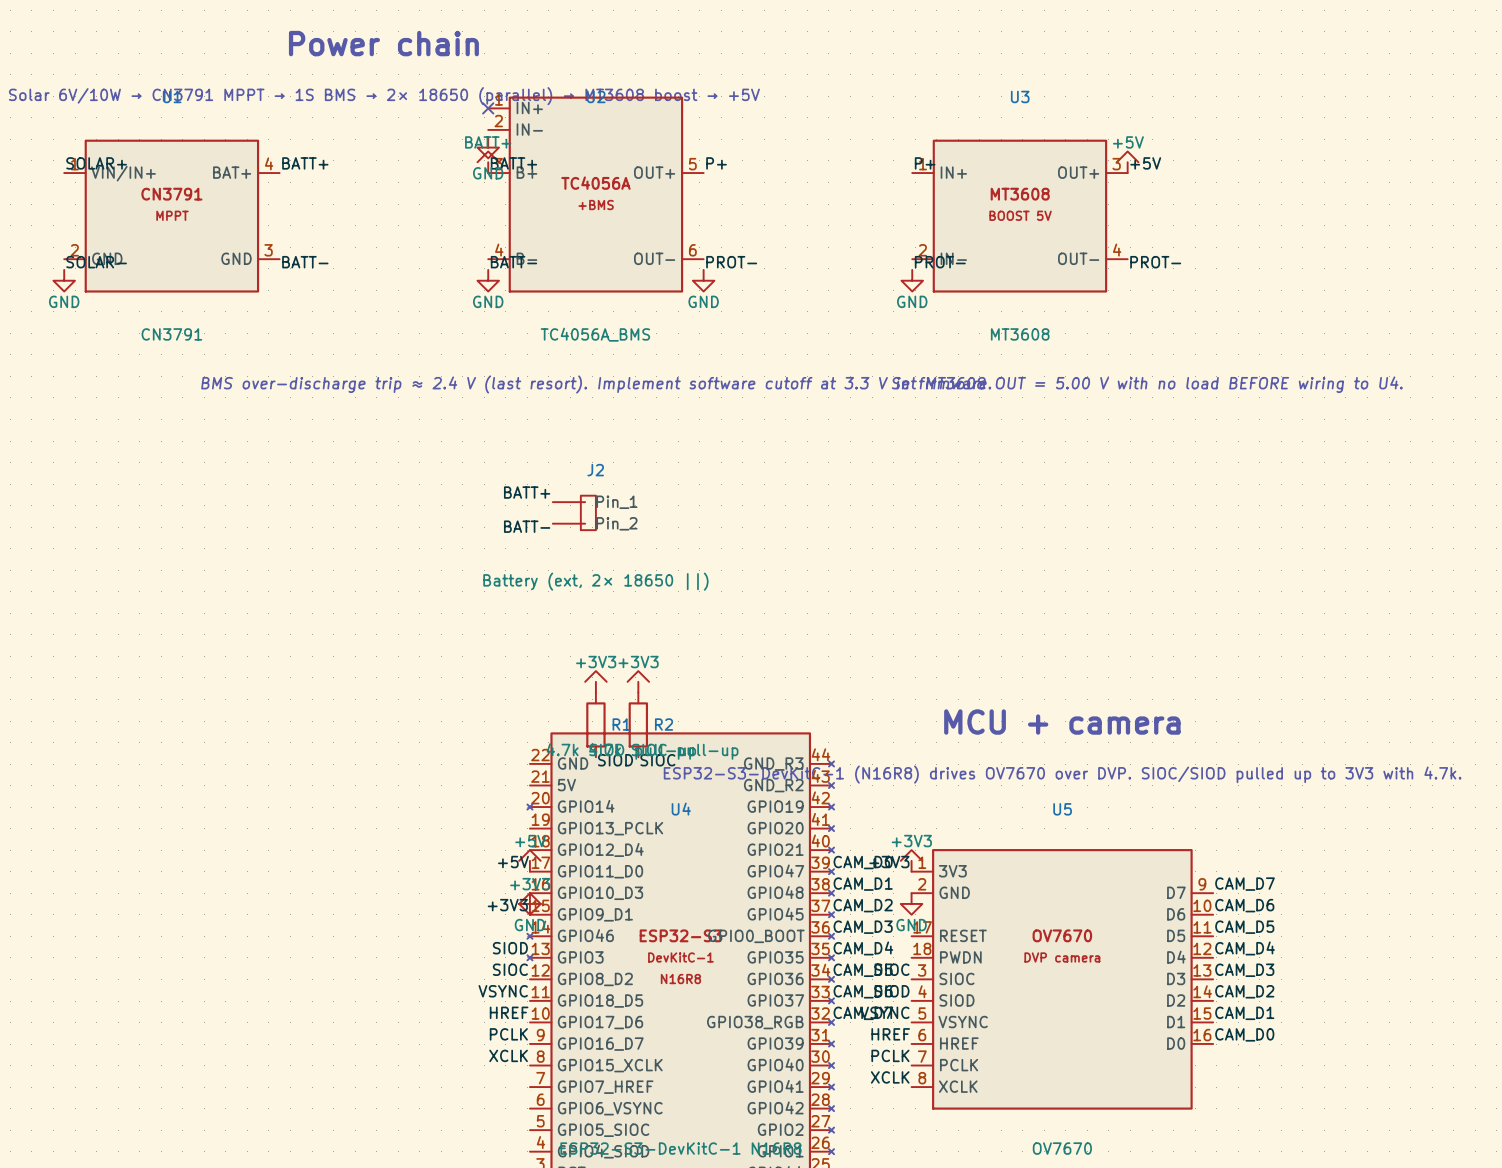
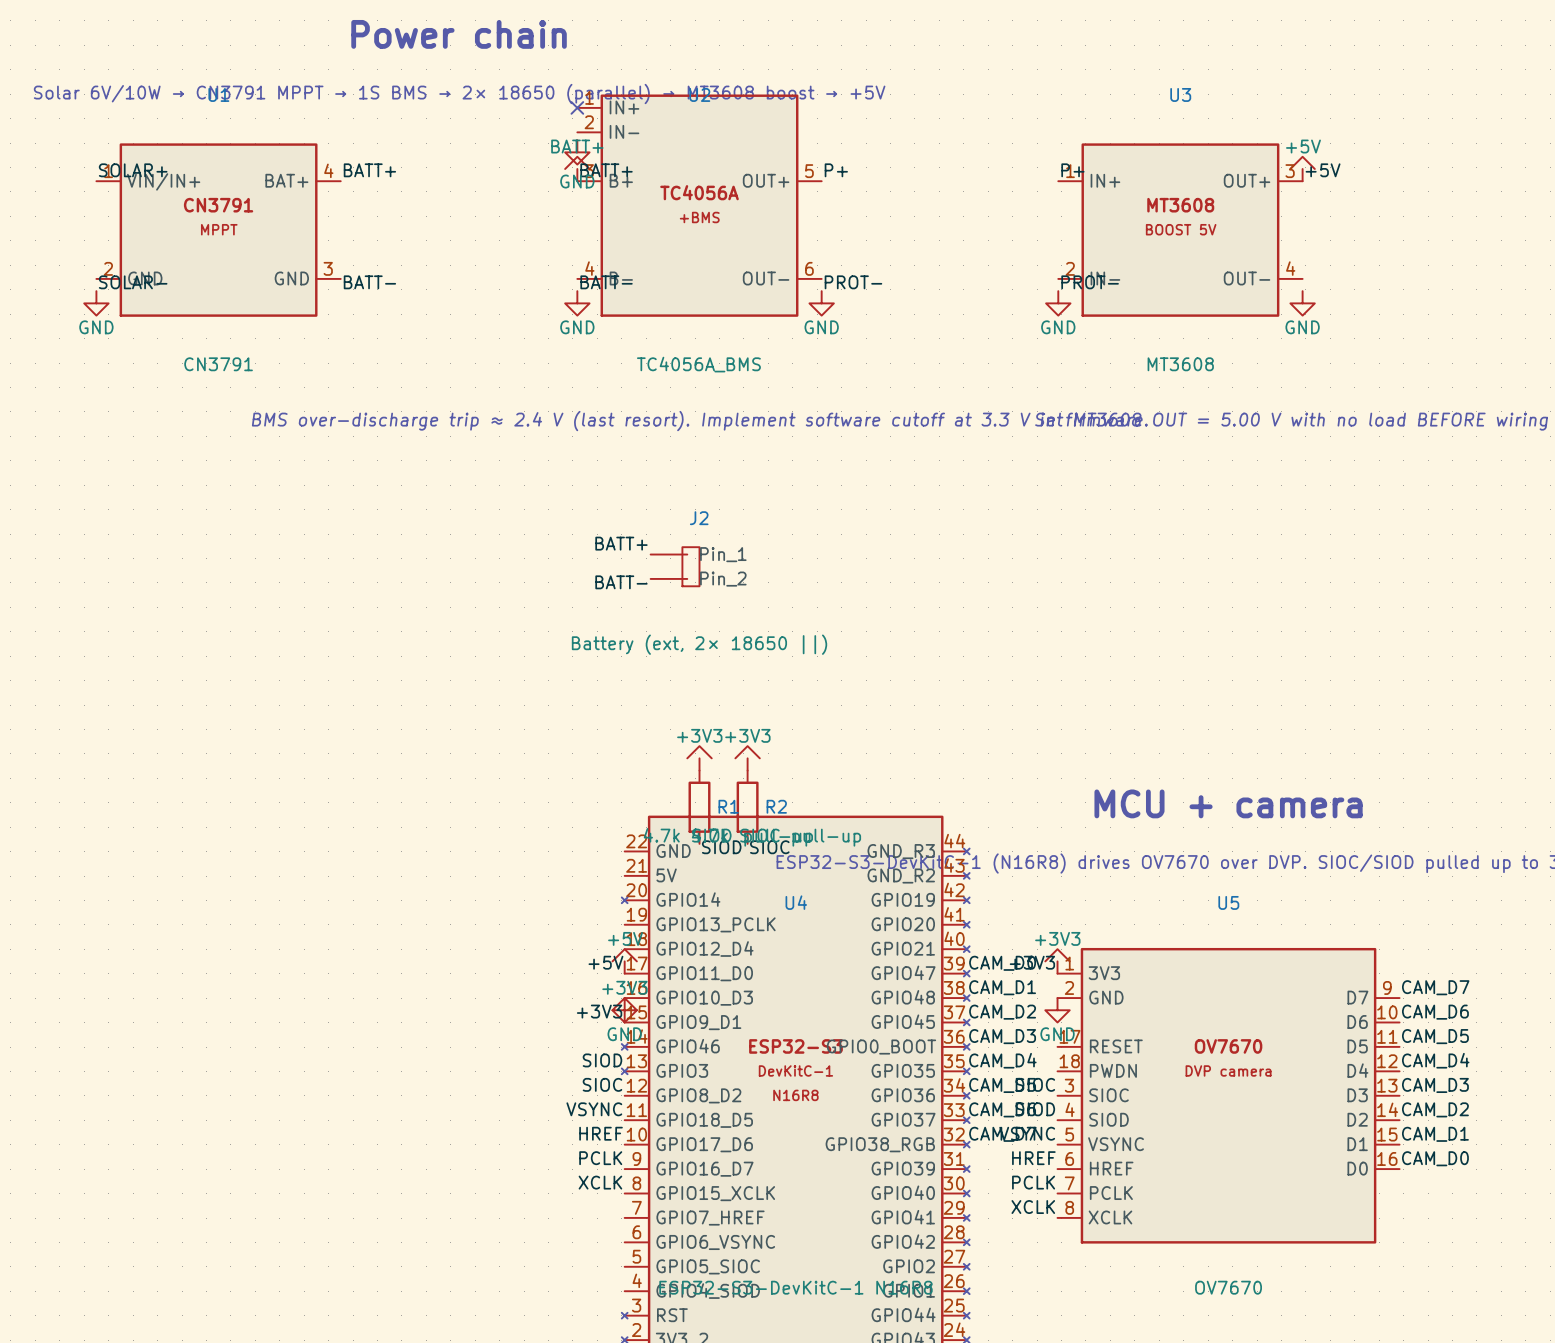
label: PROT- (1155, 262) -> none
power symbol: none -> GND (1302, 303)

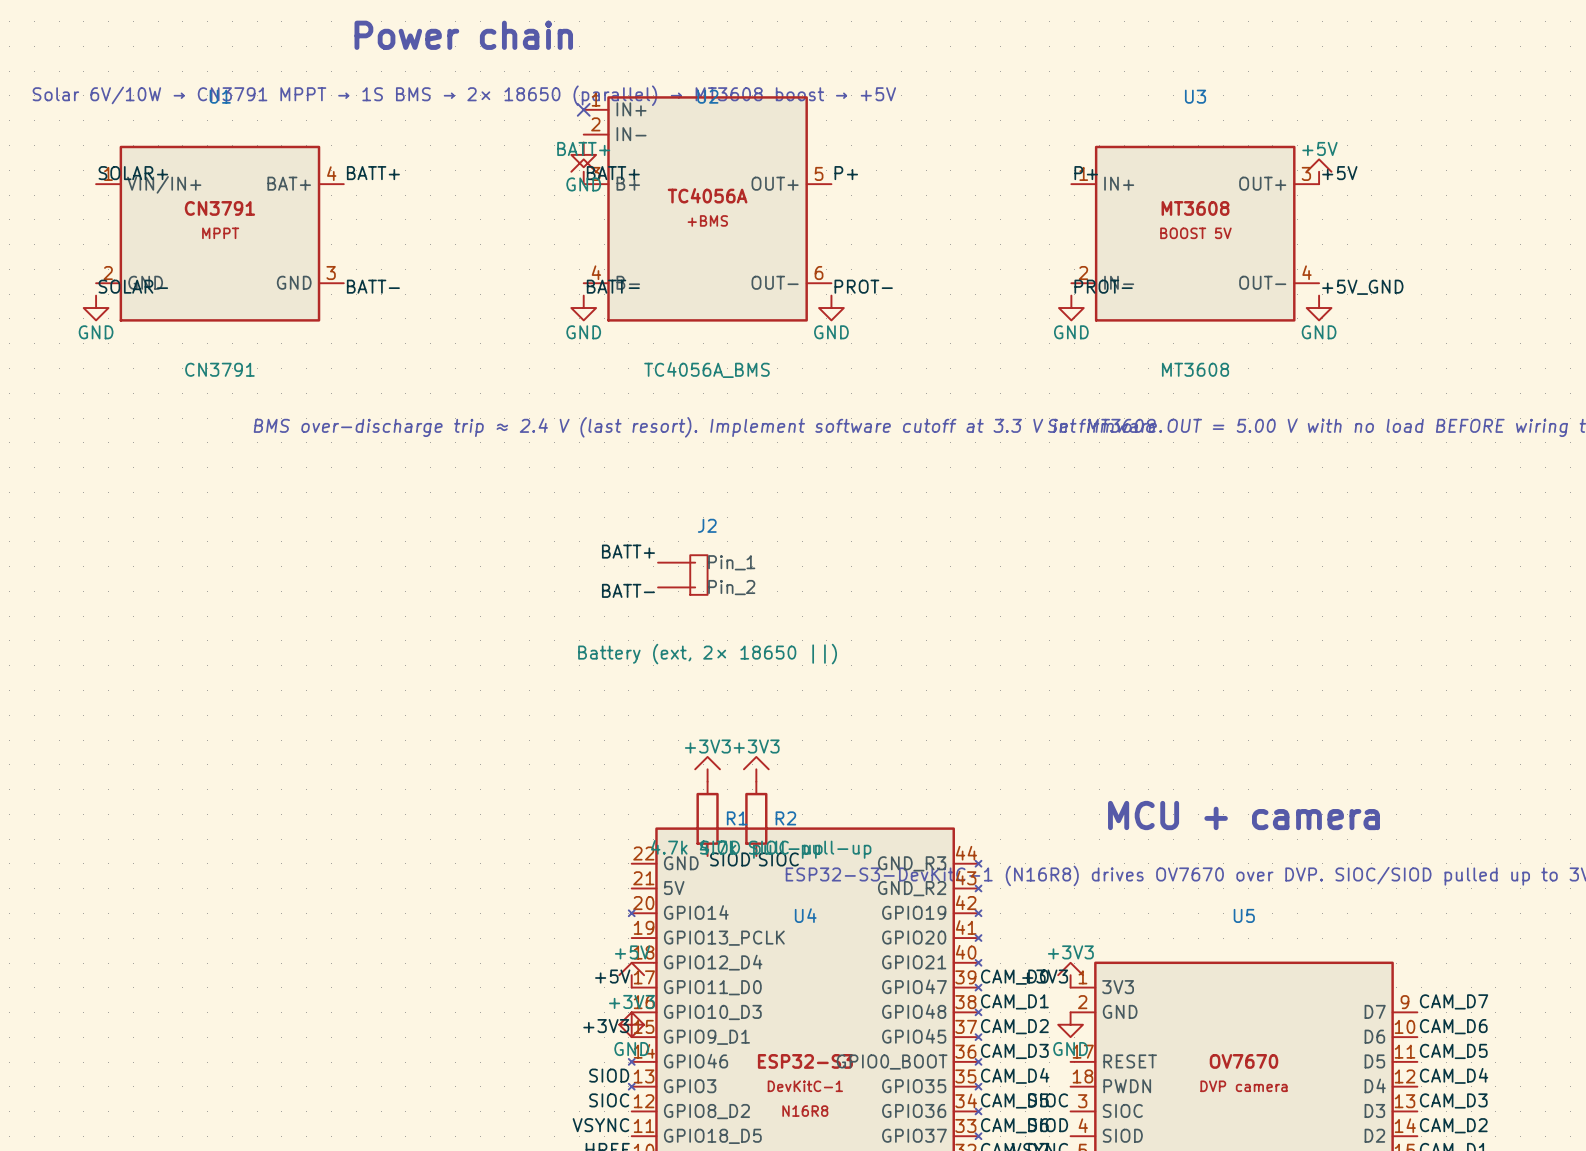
label: none -> +5V_GND (1362, 287)

